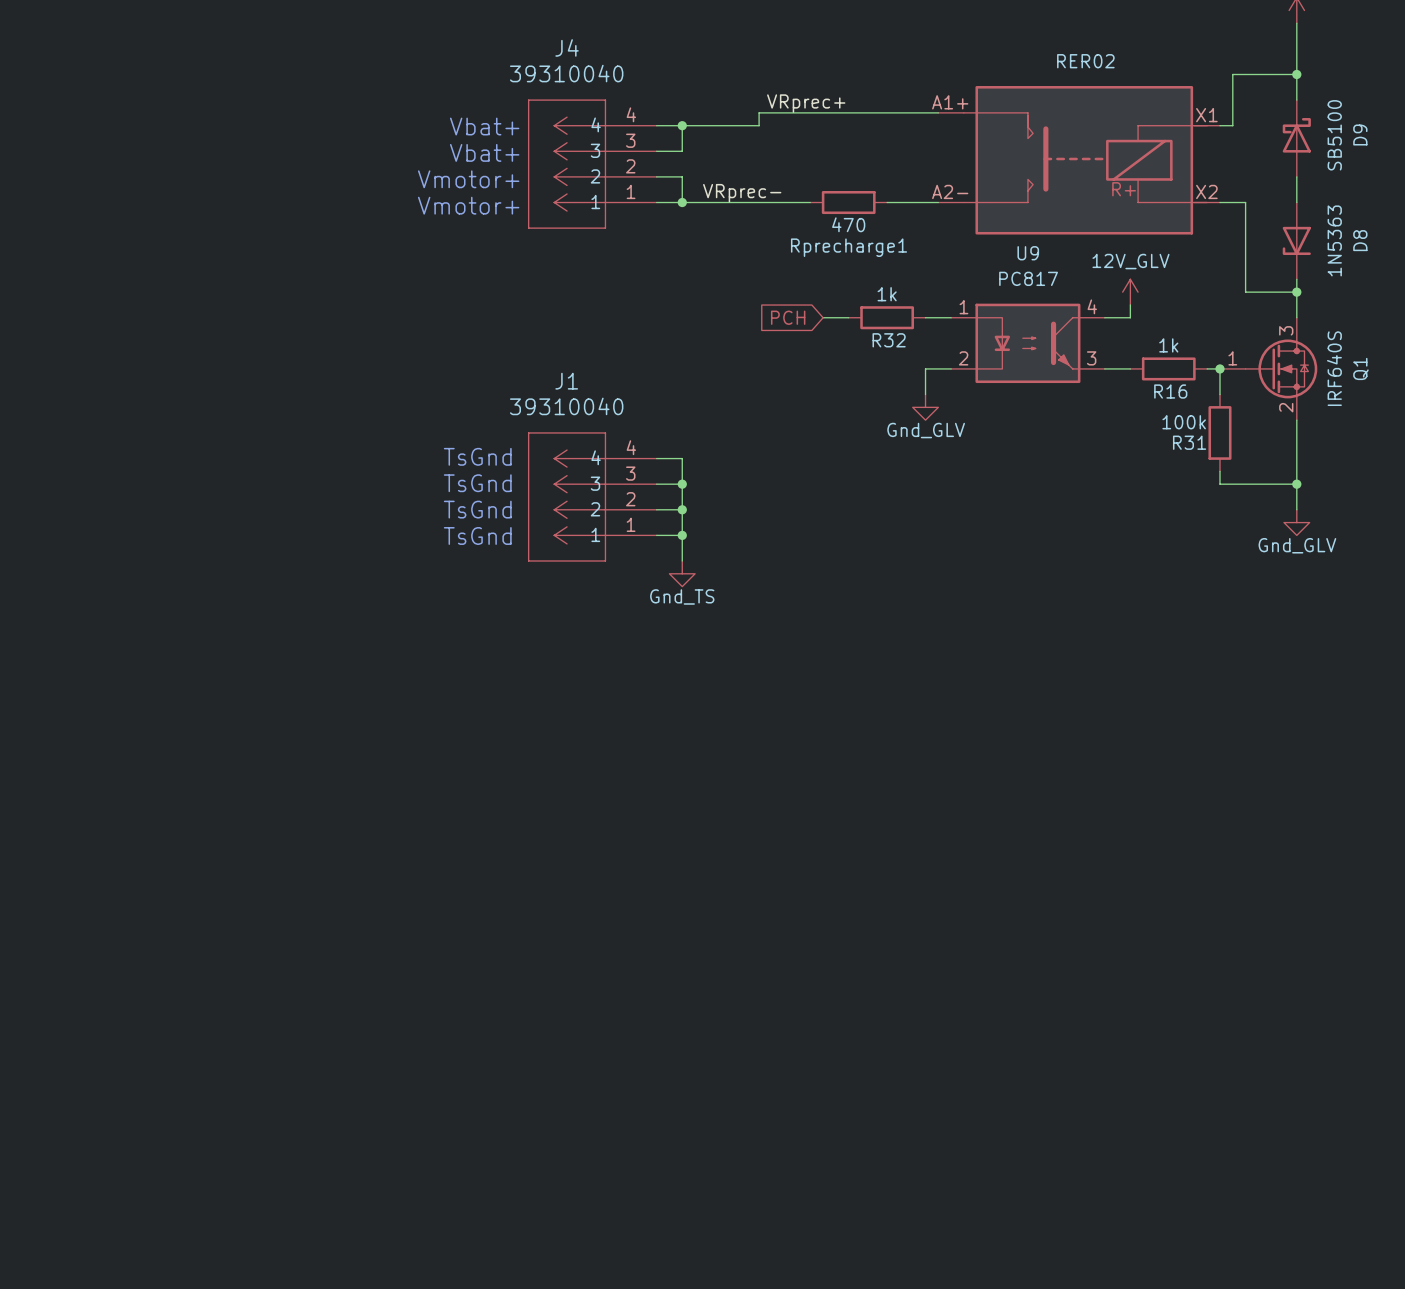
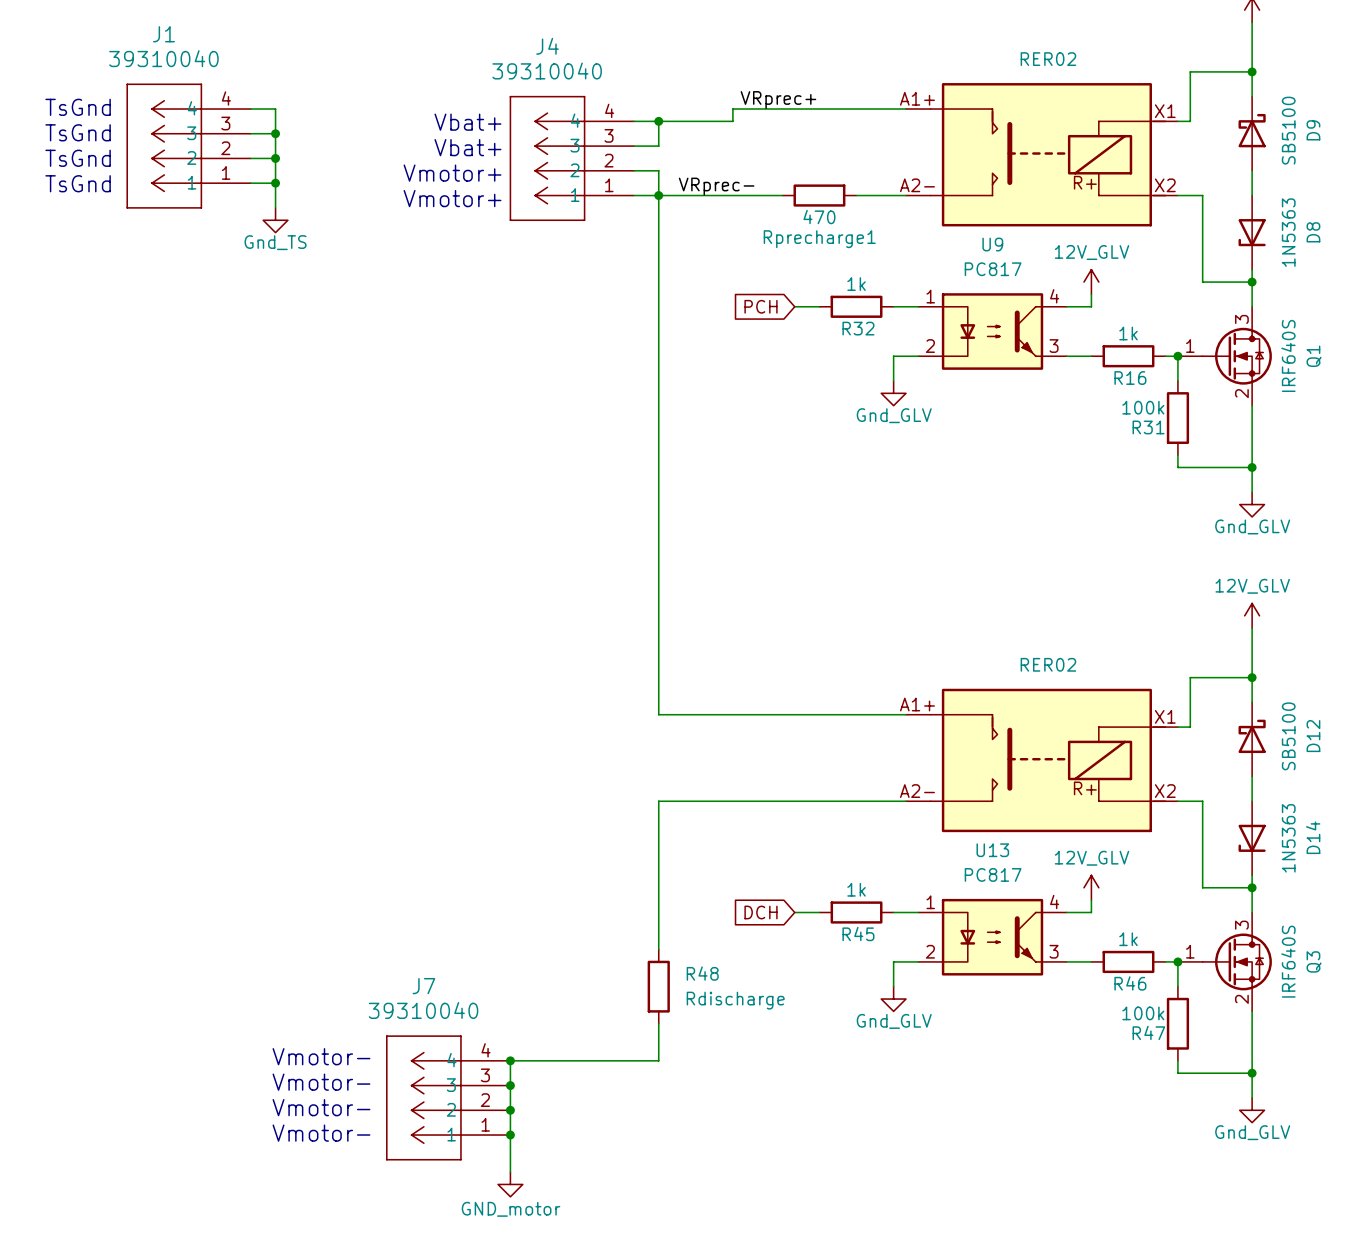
text: none -> TsGnd (78, 107)
wire: none -> (250, 109) (275, 109) (275, 207)
text: none -> TsGnd (78, 132)
wire: none -> (250, 133) (275, 133)
junction: none -> (275, 133)
text: none -> TsGnd (78, 158)
wire: none -> (250, 158) (275, 158)
junction: none -> (275, 158)
wire: none -> (250, 183) (275, 183)
junction: none -> (275, 183)
text: none -> TsGnd (78, 183)
power symbol: none -> Gnd_TS (275, 220)
text: TsGnd (477, 456) -> none
wire: (656, 458) (682, 458) -> (658, 195) (658, 442)
text: TsGnd (477, 483) -> none
wire: (656, 484) (682, 484) -> none
junction: (682, 484) -> none
J1 position: (592, 496) -> (188, 146)
text: TsGnd (477, 509) -> none
wire: (656, 509) (682, 509) -> none
junction: (682, 509) -> none
text: TsGnd (477, 535) -> none
wire: (656, 535) (682, 535) -> none
junction: (682, 535) -> none
wire: none -> (658, 541) (658, 714) (905, 714)
power symbol: Gnd_TS (682, 573) -> none
power symbol: none -> 12V_GLV (1252, 615)
wire: none -> (1252, 628) (1252, 702)
wire: none -> (1252, 677) (1190, 677) (1190, 727) (1177, 727)
junction: none -> (1252, 677)
D12: none -> SB5100 (1252, 739)
part: none -> RER02 (1041, 760)
wire: none -> (1252, 776) (1252, 801)
wire: none -> (905, 801) (658, 801) (658, 949)
wire: none -> (1177, 801) (1202, 801) (1202, 887) (1252, 887)
D14: none -> 1N5363 (1252, 838)
wire: none -> (1252, 875) (1252, 912)
power symbol: none -> 12V_GLV (1091, 887)
junction: none -> (1252, 887)
wire: none -> (1091, 900) (1091, 912) (1066, 912)
global label: none -> DCH (761, 912)
wire: none -> (794, 912) (819, 912)
R45: none -> 1k (856, 912)
wire: none -> (893, 912) (918, 912)
U13: none -> PC817 (992, 937)
wire: none -> (918, 961) (893, 961) (893, 986)
wire: none -> (1066, 961) (1091, 961)
R46: none -> 1k (1128, 961)
wire: none -> (1165, 961) (1177, 961) (1177, 986)
junction: none -> (1177, 961)
Q3: none -> IRF640S (1224, 961)
R48: none -> Rdischarge (658, 986)
power symbol: none -> Gnd_GLV (893, 999)
wire: none -> (1252, 1011) (1252, 1097)
wire: none -> (658, 1023) (658, 1060) (510, 1060) (510, 1172)
R47: none -> 100k (1177, 1023)
text: none -> Vmotor- (321, 1056)
junction: none -> (510, 1060)
wire: none -> (1177, 1060) (1177, 1073) (1252, 1073)
junction: none -> (1252, 1073)
text: none -> Vmotor- (321, 1082)
junction: none -> (510, 1085)
J7: none -> 39310040 (448, 1097)
text: none -> Vmotor- (321, 1107)
junction: none -> (510, 1110)
power symbol: none -> Gnd_GLV (1252, 1110)
text: none -> Vmotor- (321, 1133)
junction: none -> (510, 1135)
power symbol: none -> GND_motor (510, 1184)

